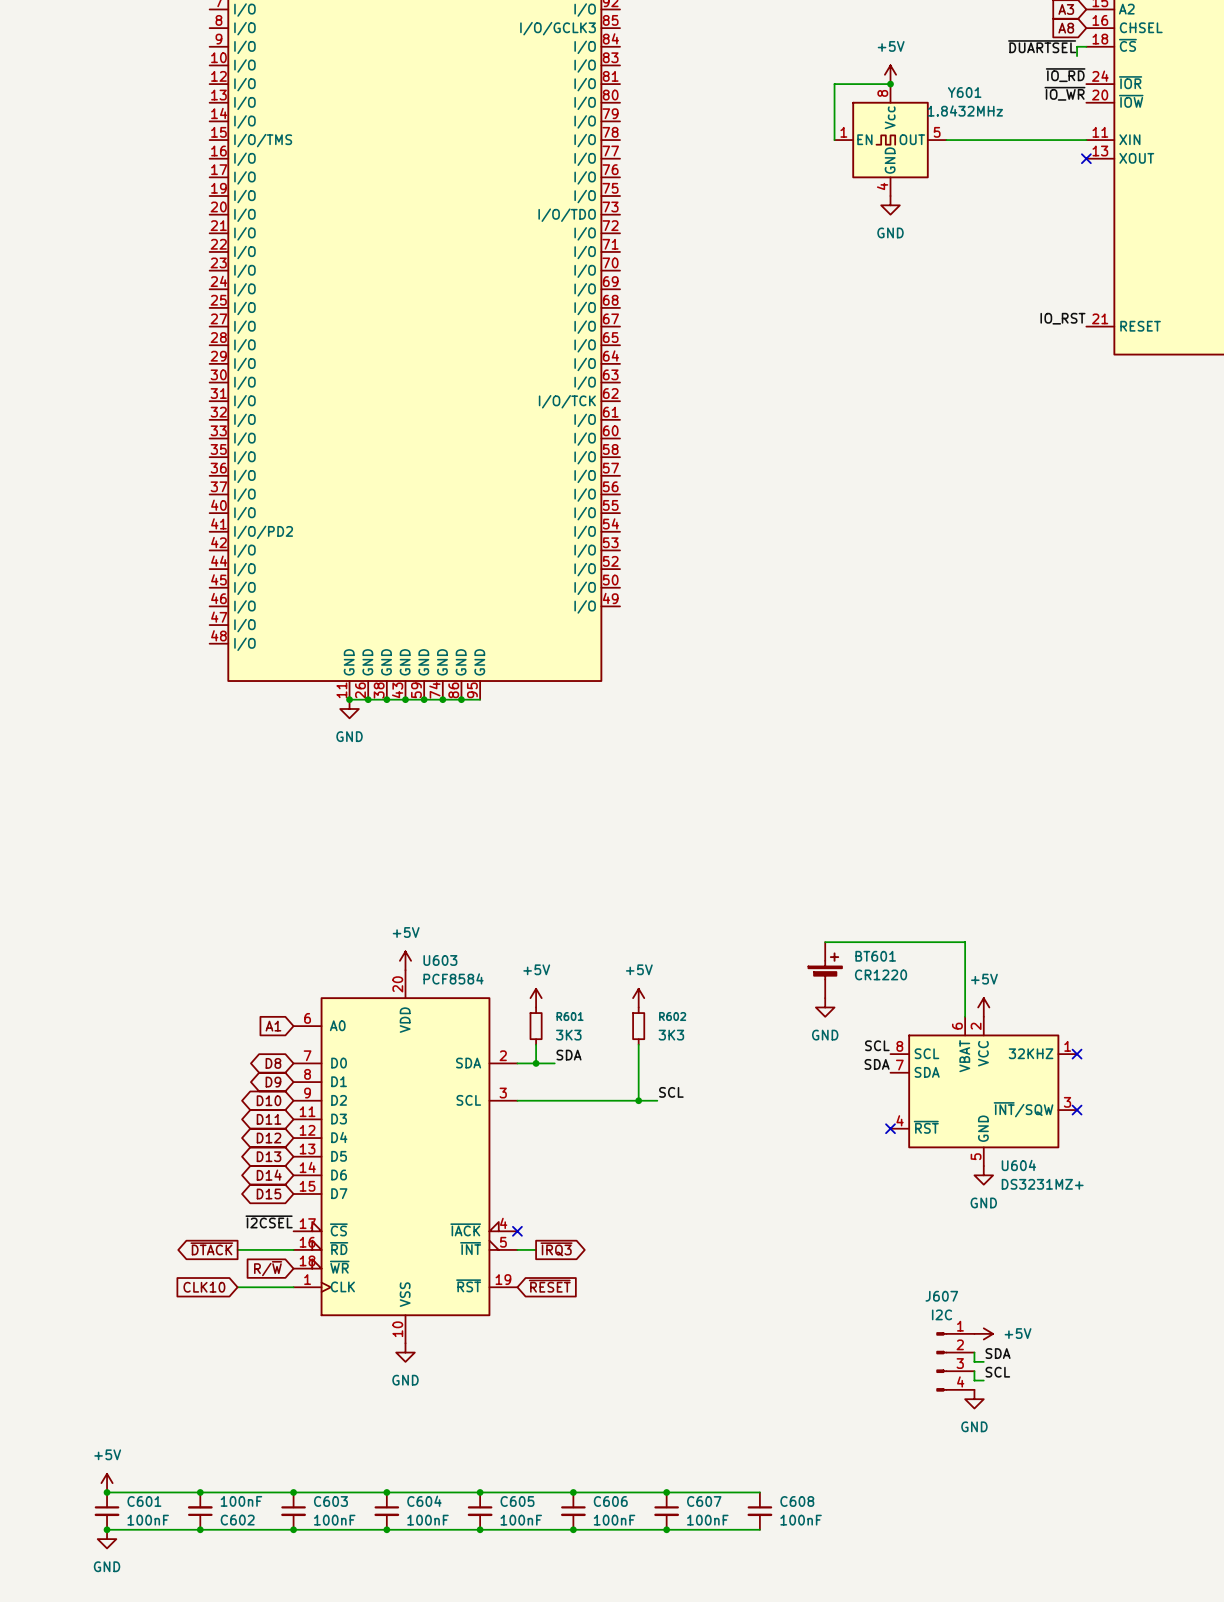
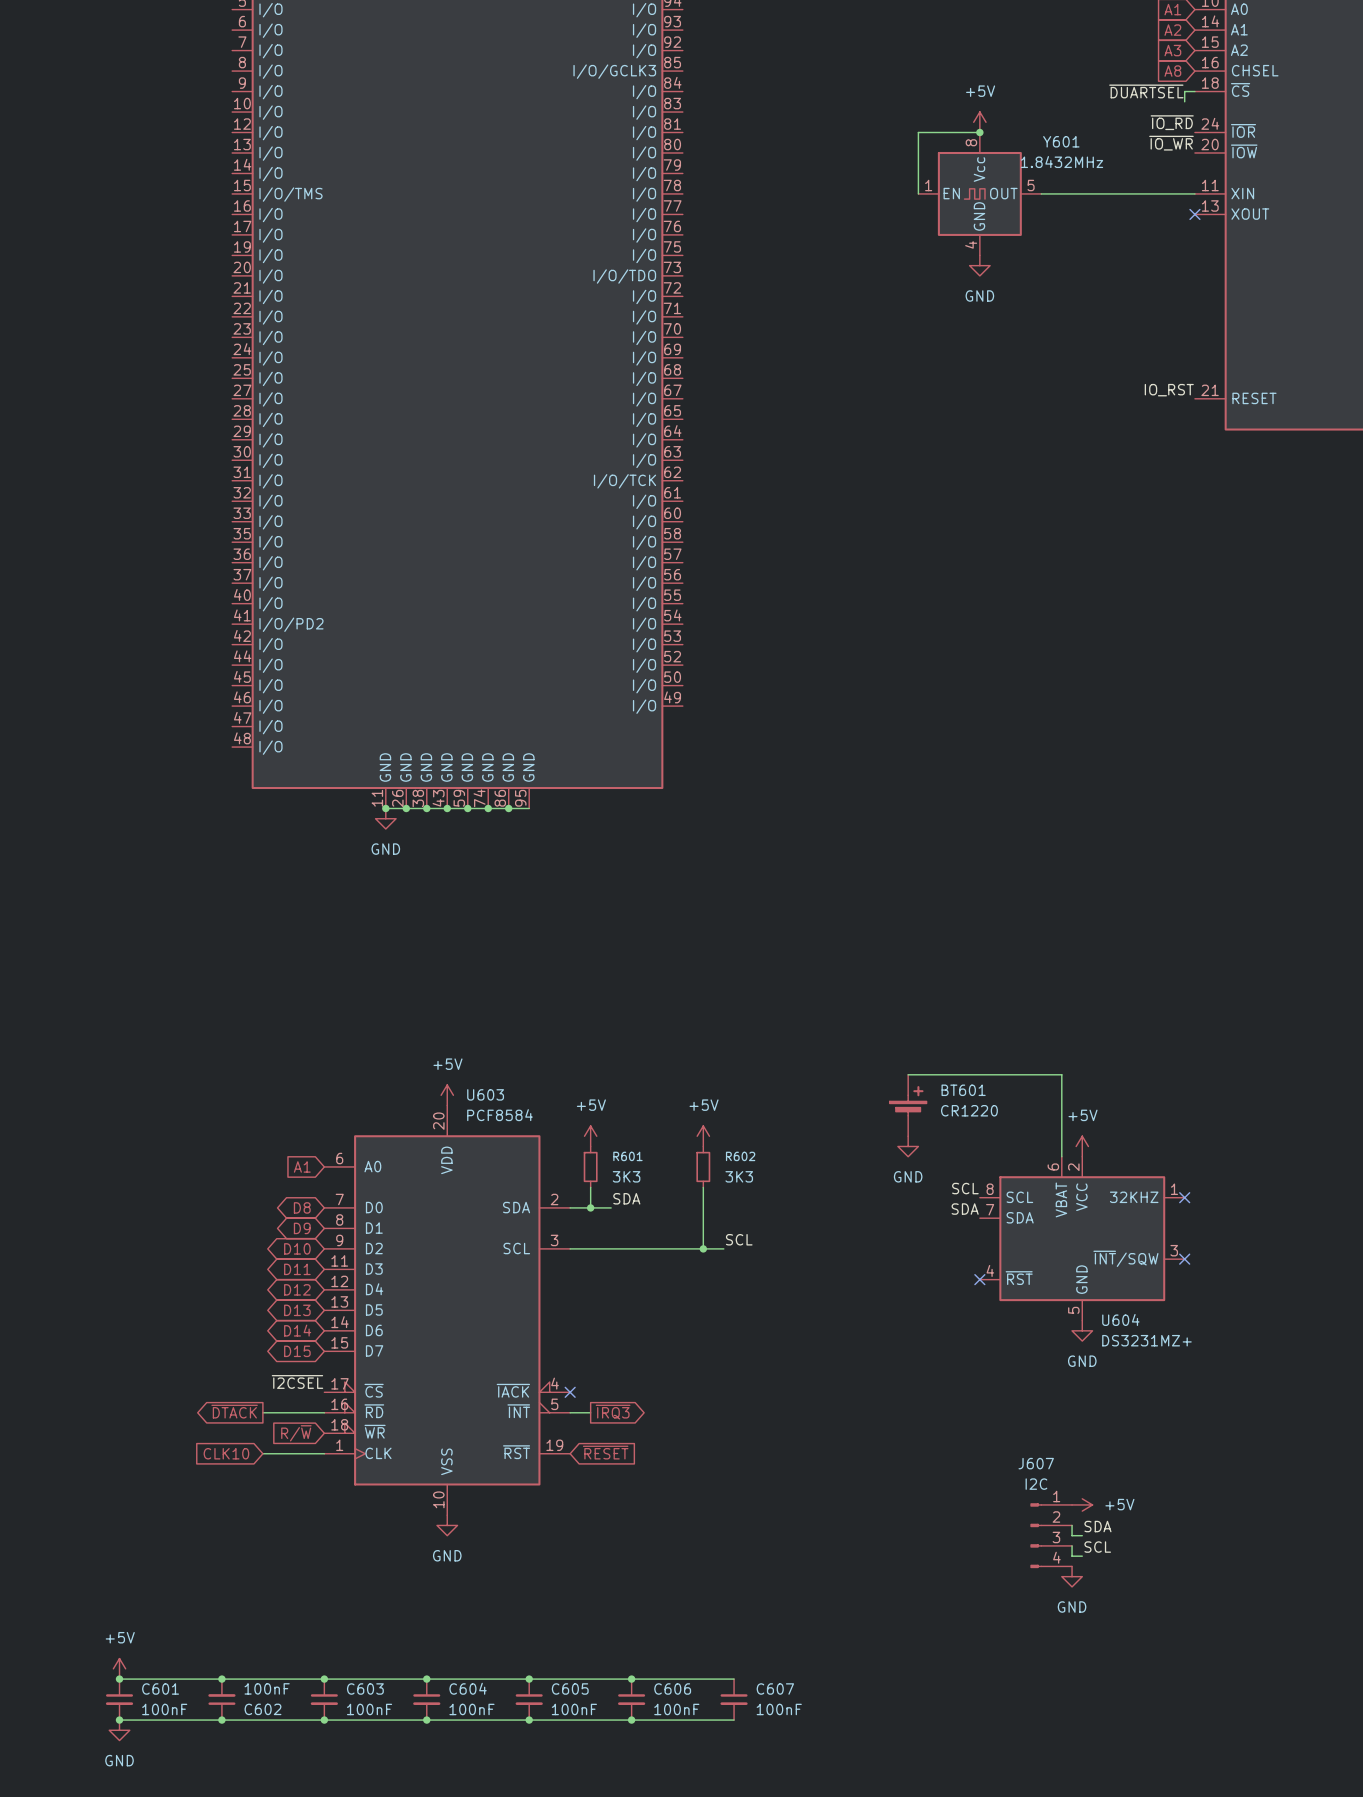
wire: (666, 1492) (759, 1492) -> none
junction: (666, 1492) -> none
C608: 100nF (759, 1511) -> none
wire: (666, 1529) (759, 1529) -> none
junction: (666, 1529) -> none

